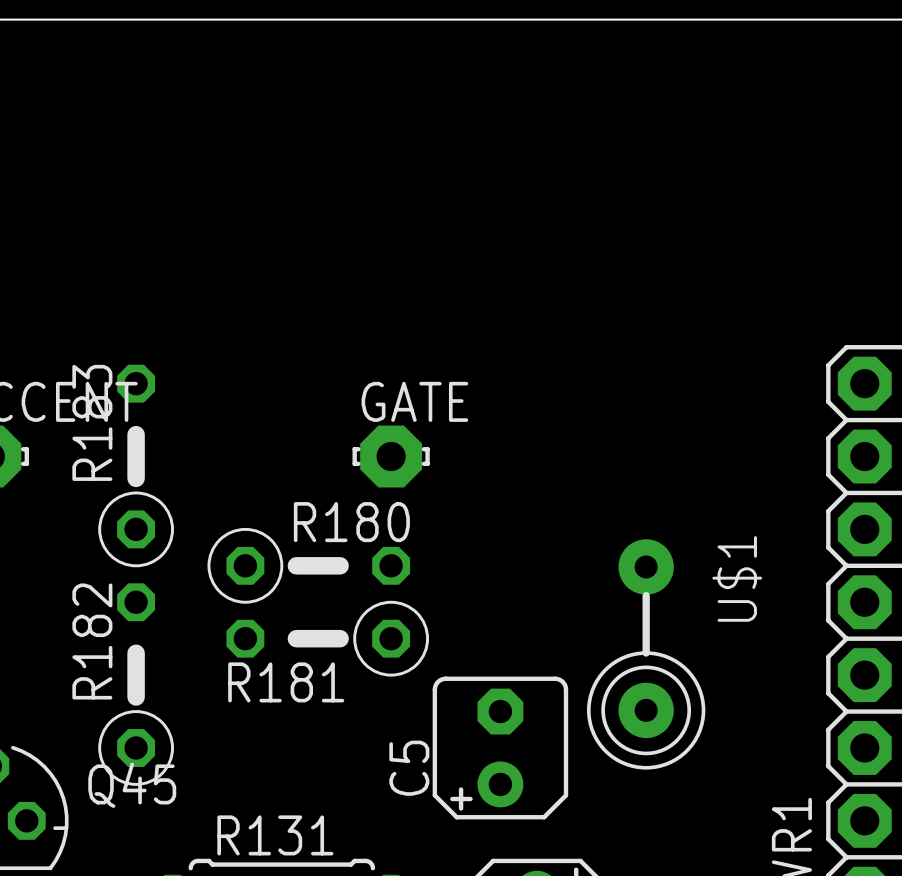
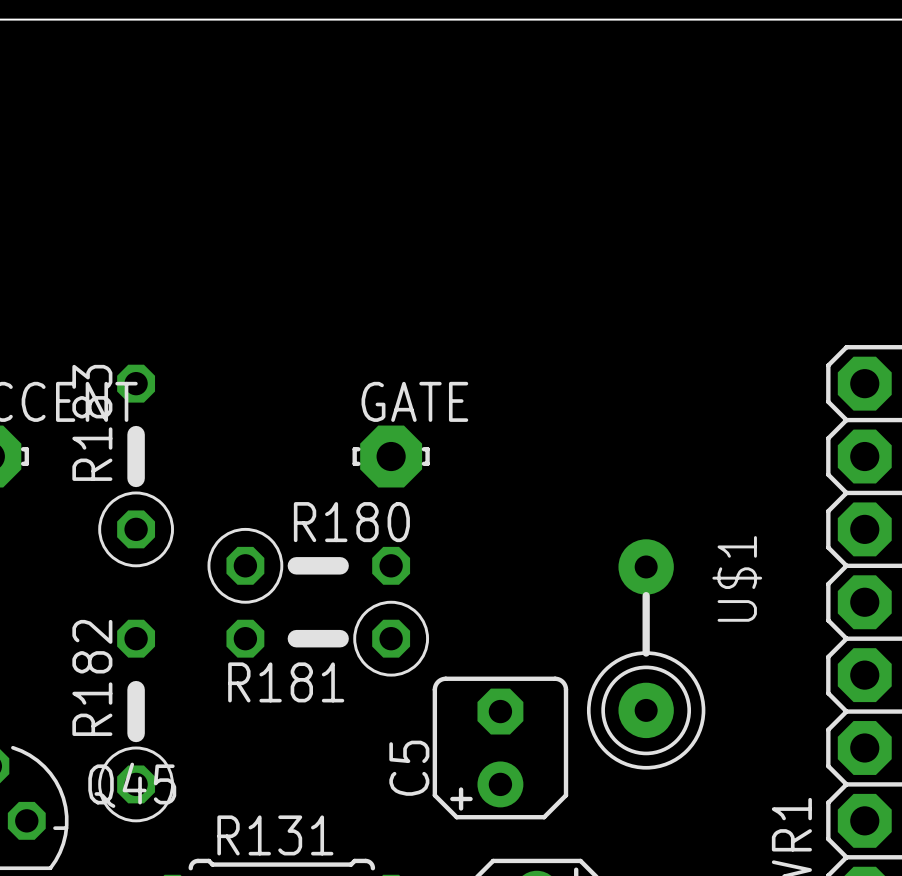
R182 position: (136, 684) -> (136, 721)

